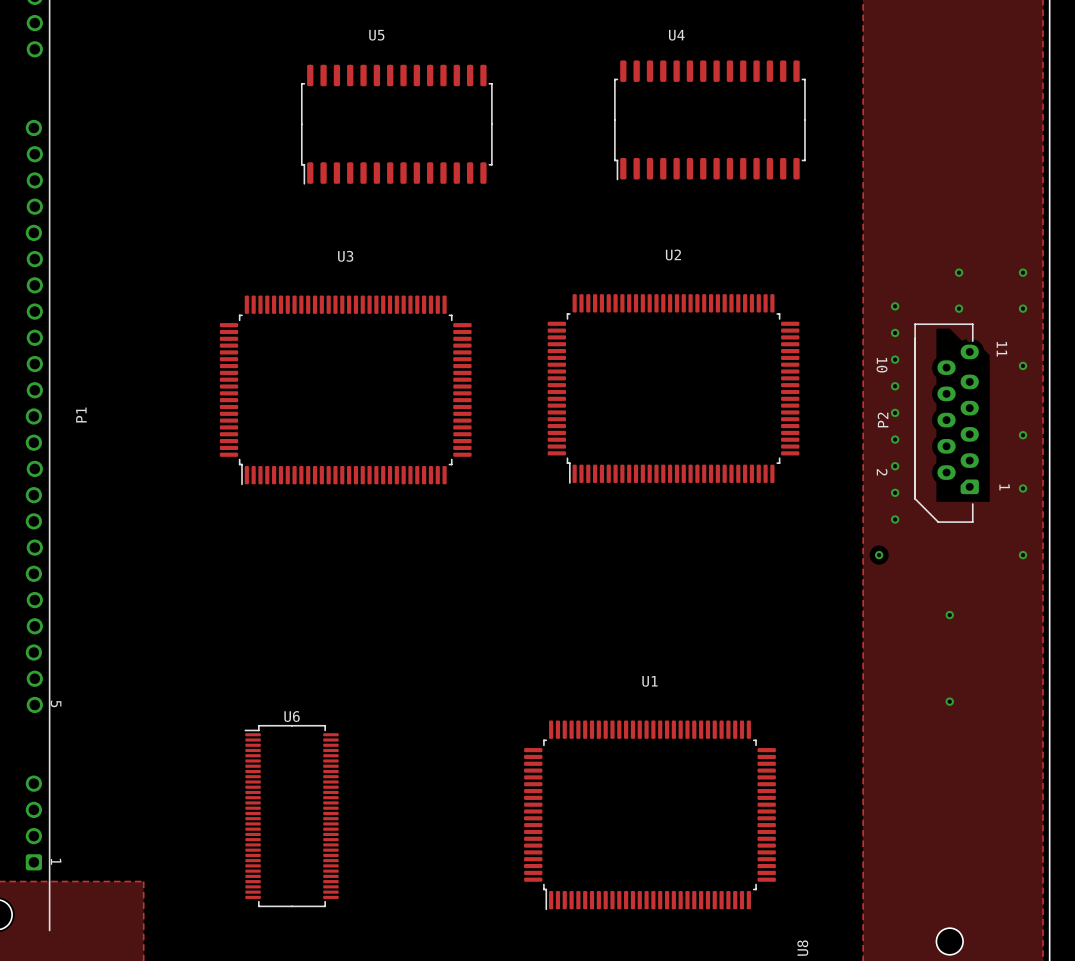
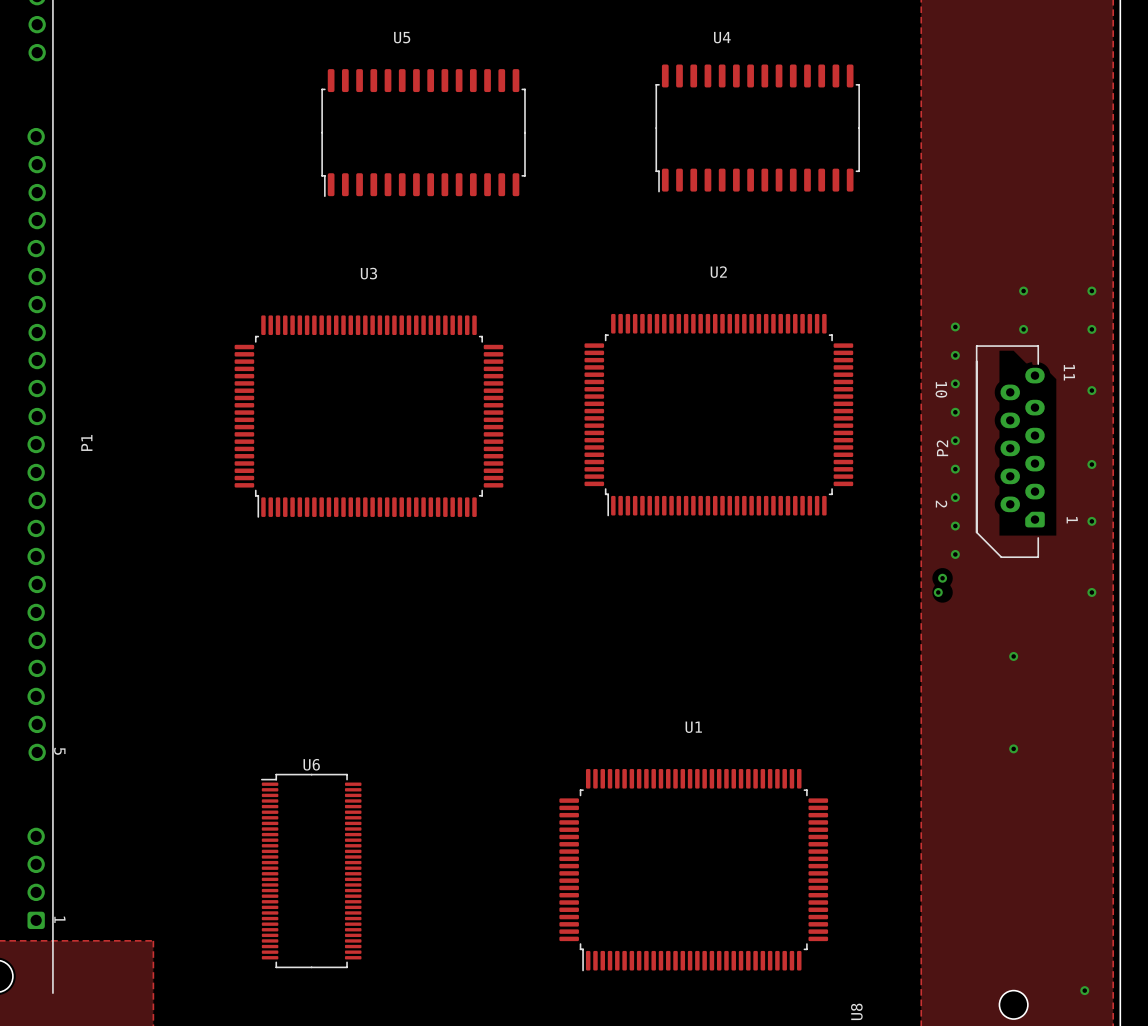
via: none -> (942, 578)
via: none -> (1084, 990)

